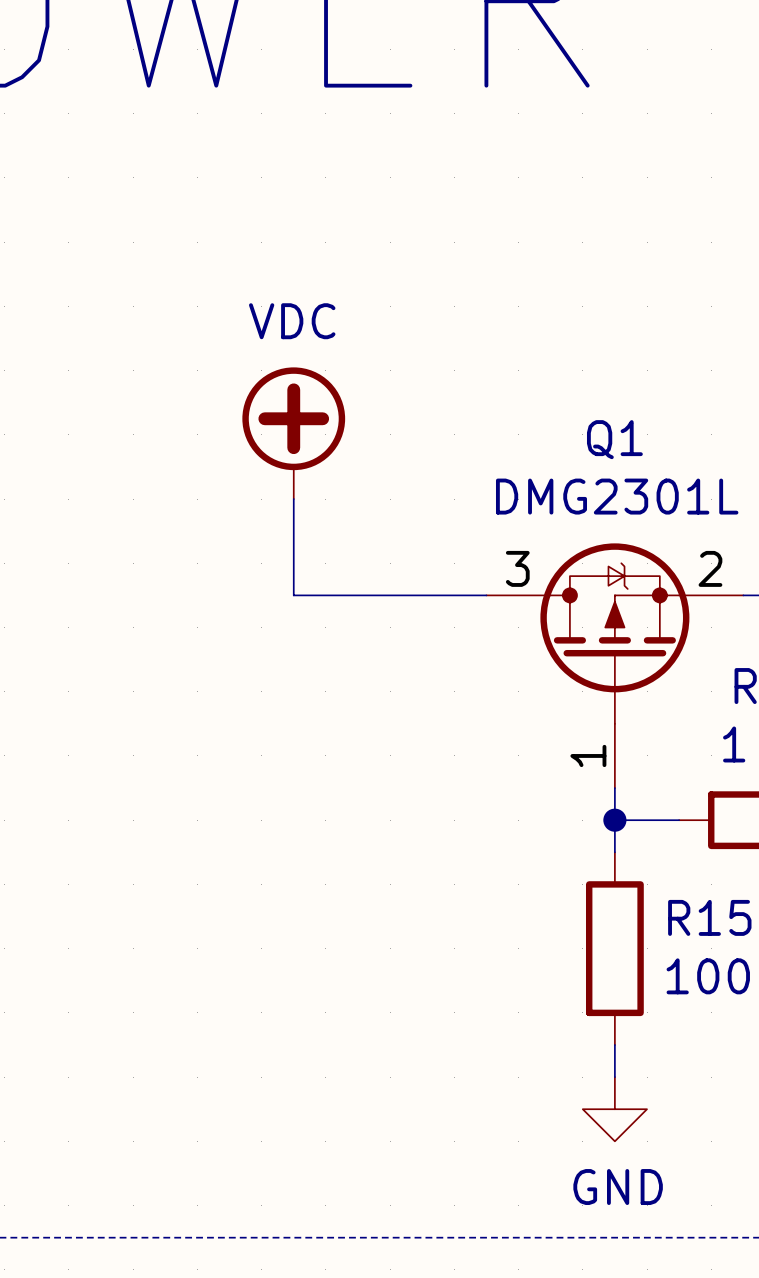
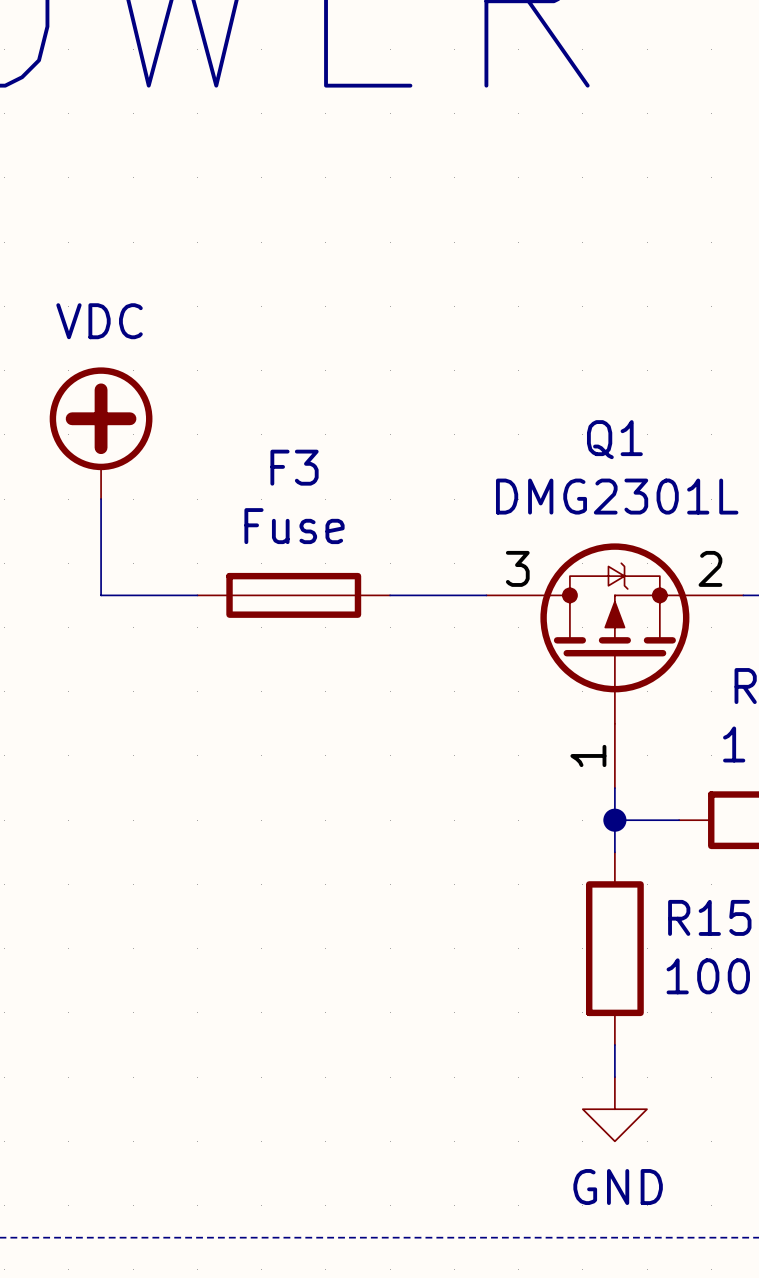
power symbol position: VDC (293, 433) -> VDC (101, 433)
wire: (293, 499) (293, 595) (390, 595) -> (101, 499) (101, 595) (197, 595)
F3: none -> Fuse (293, 595)

